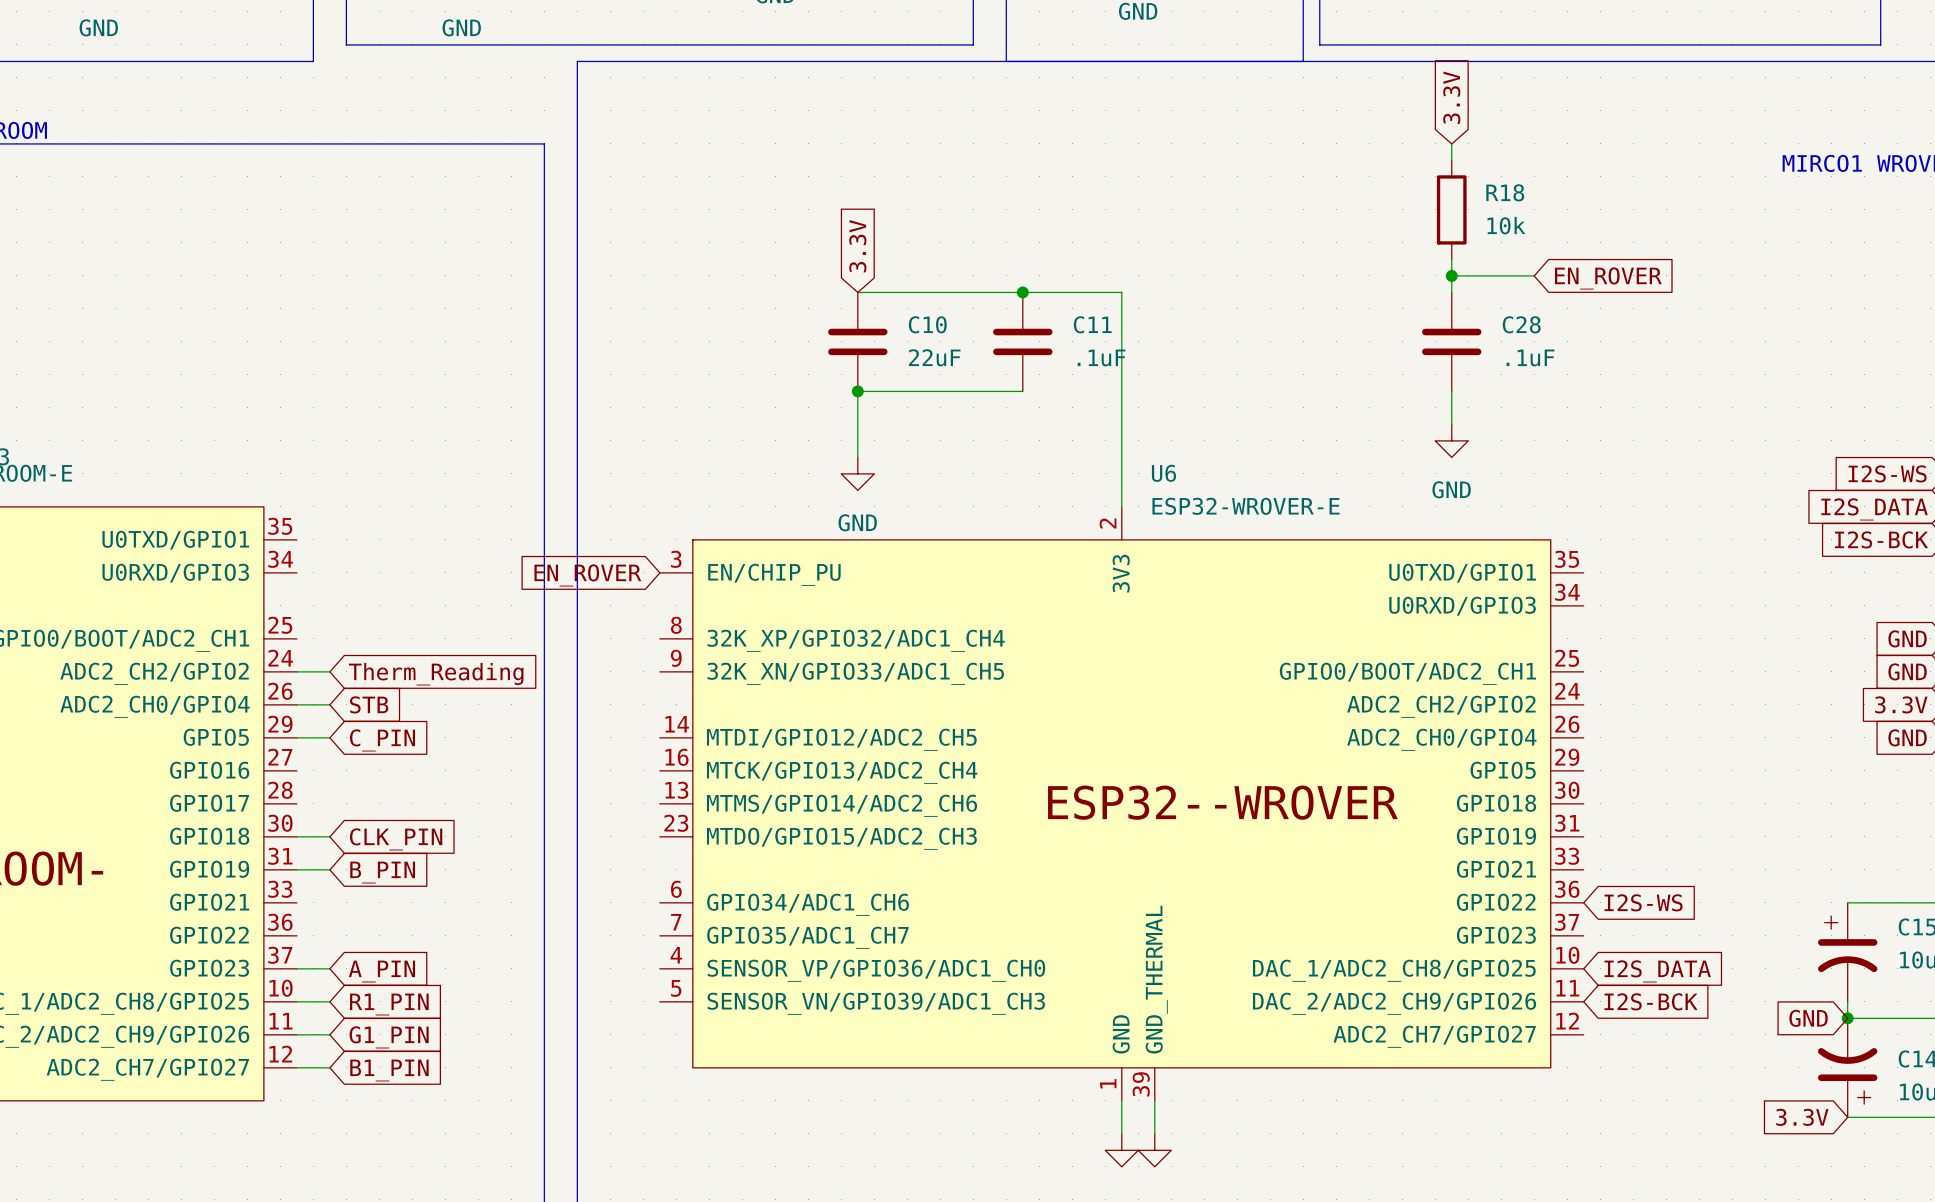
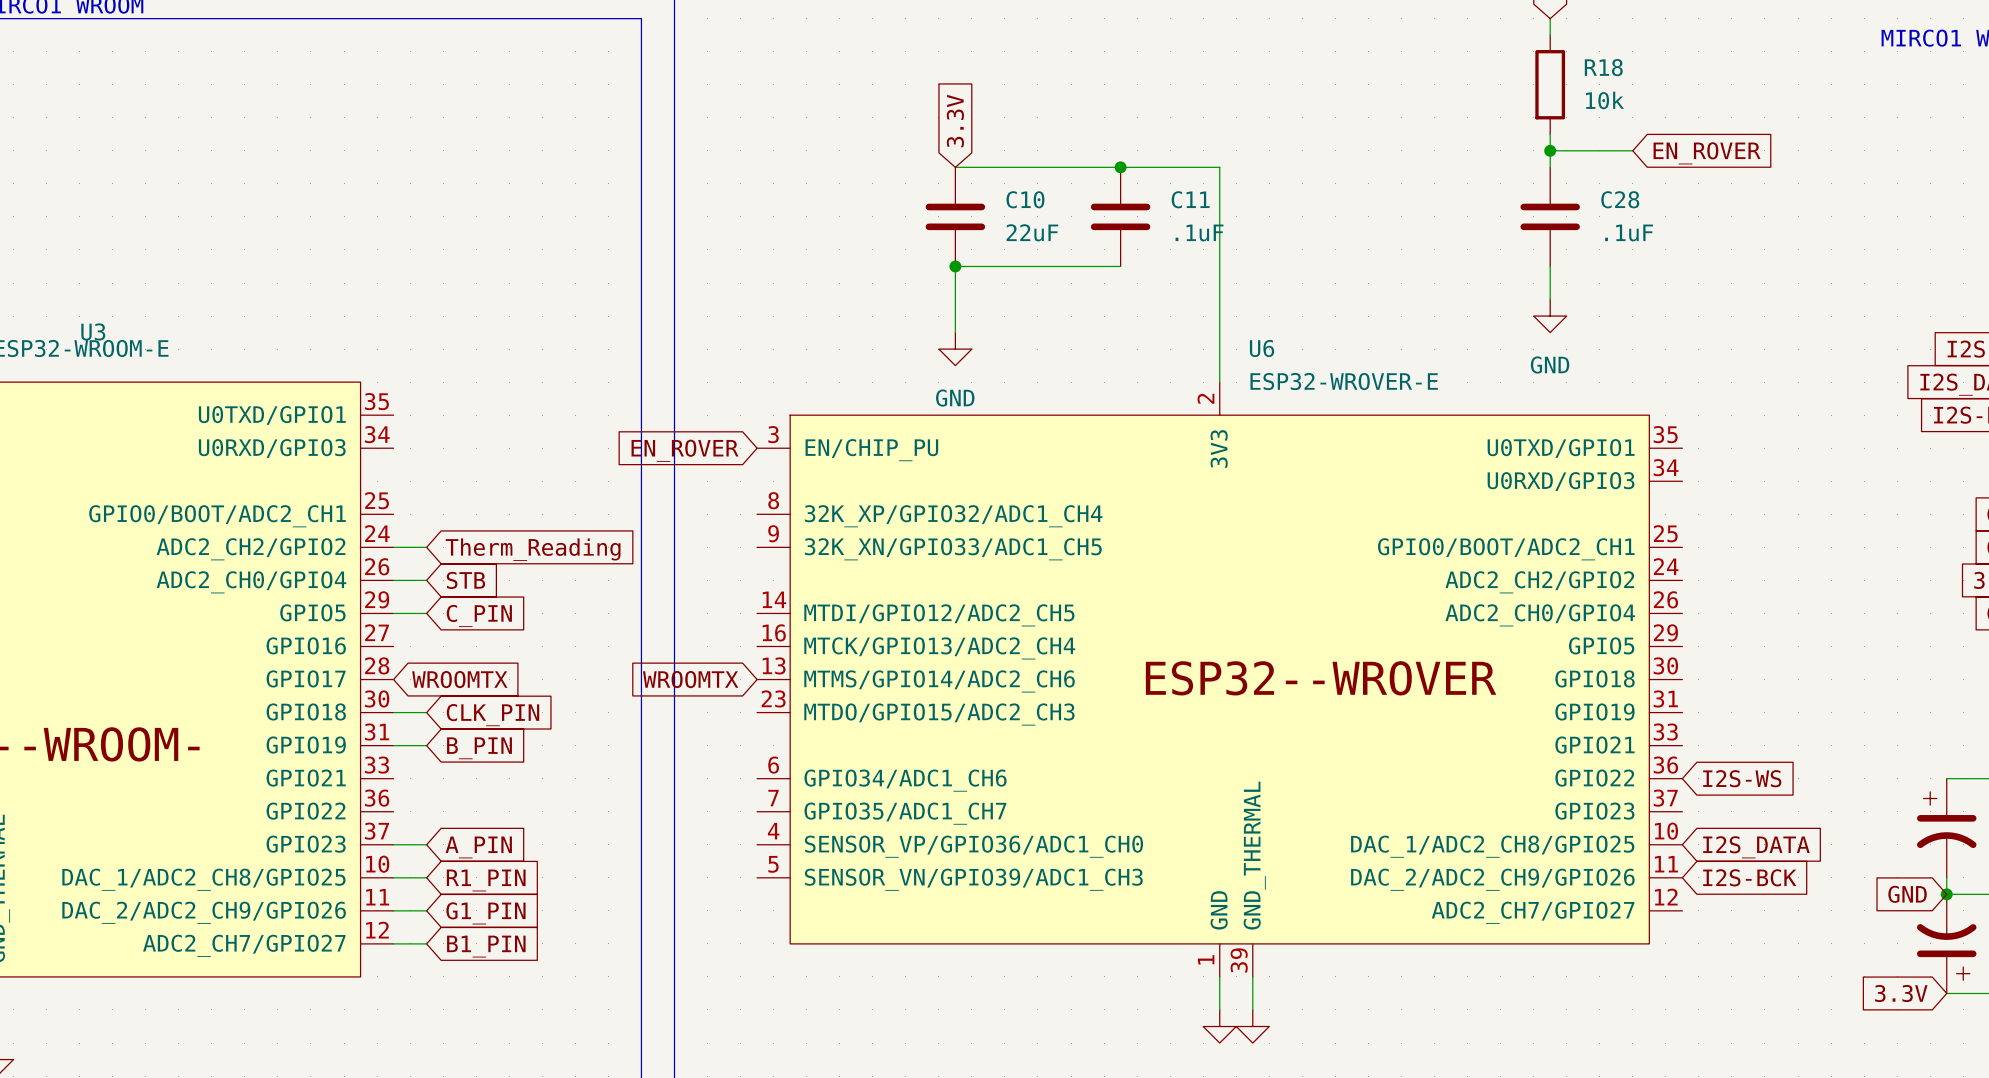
global label: none -> WROOMTX (459, 679)
global label: none -> WROOMTX (690, 679)

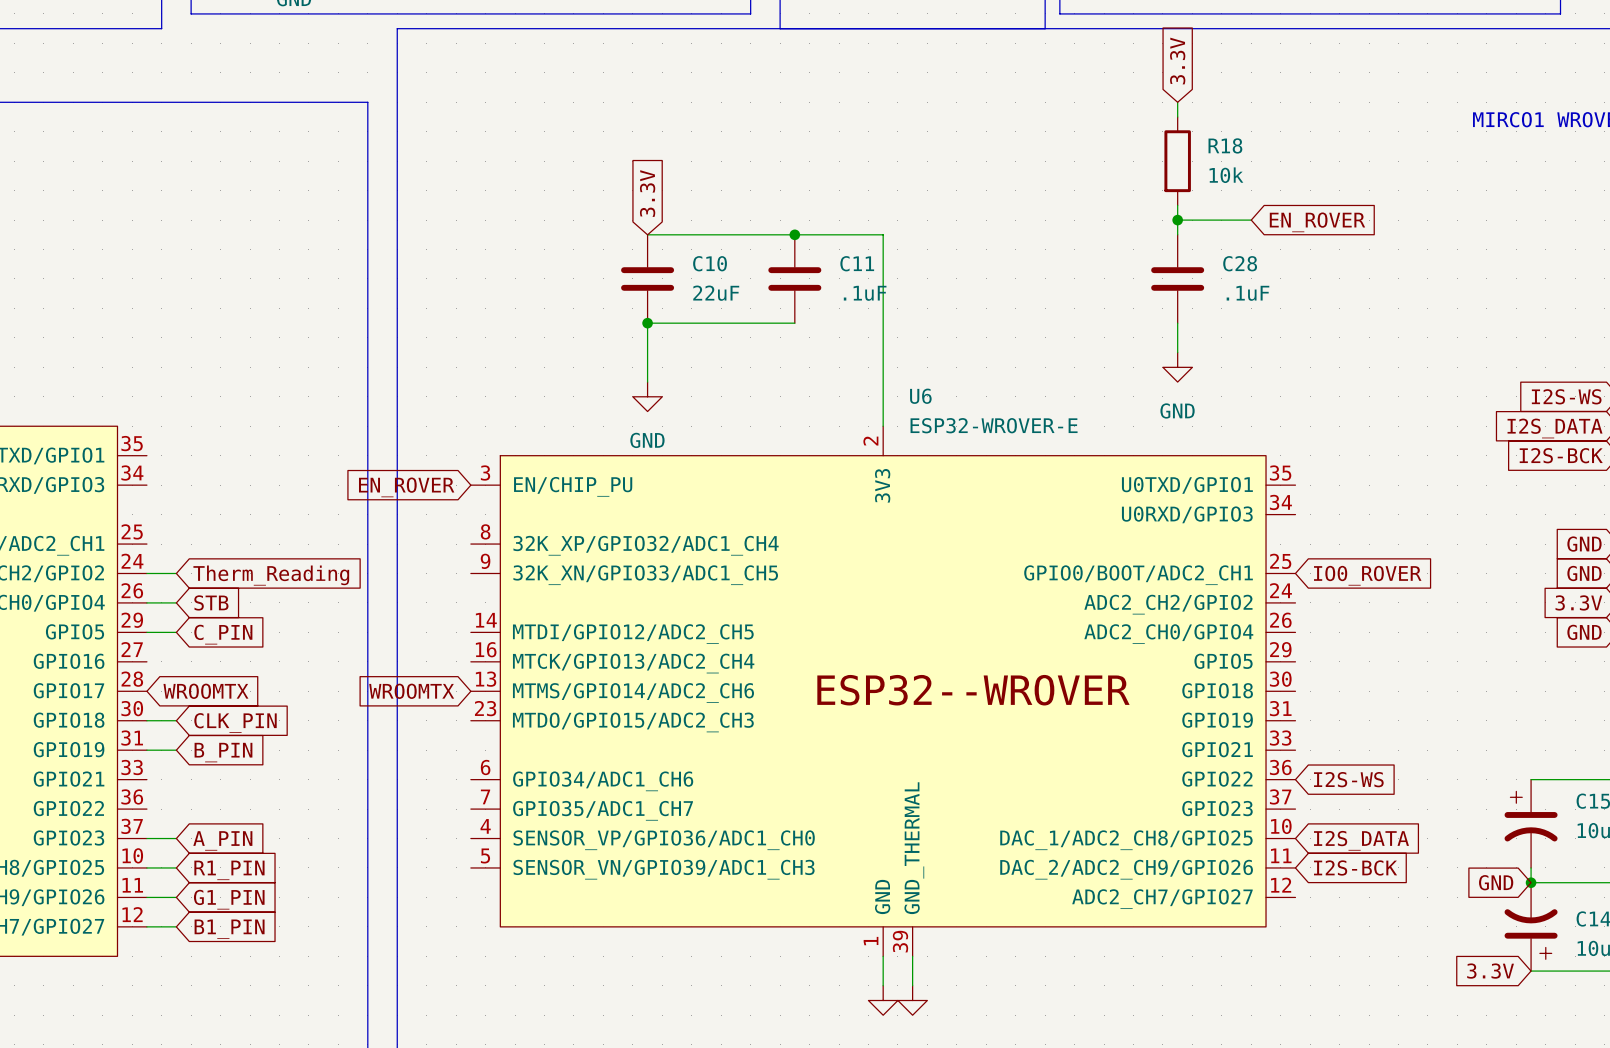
global label: none -> IO0_ROVER (1367, 575)

